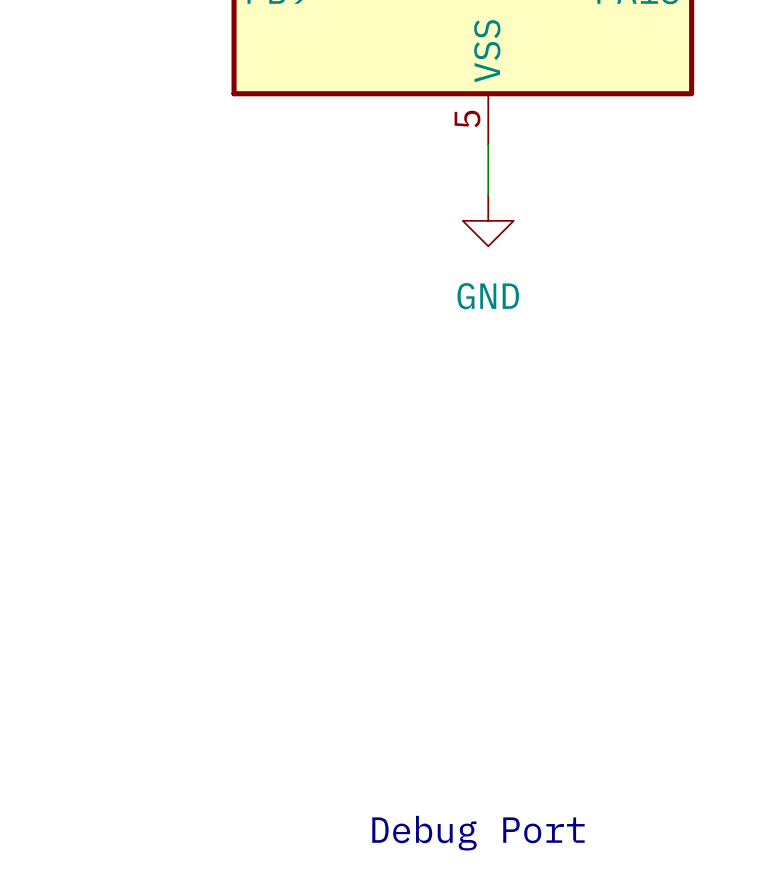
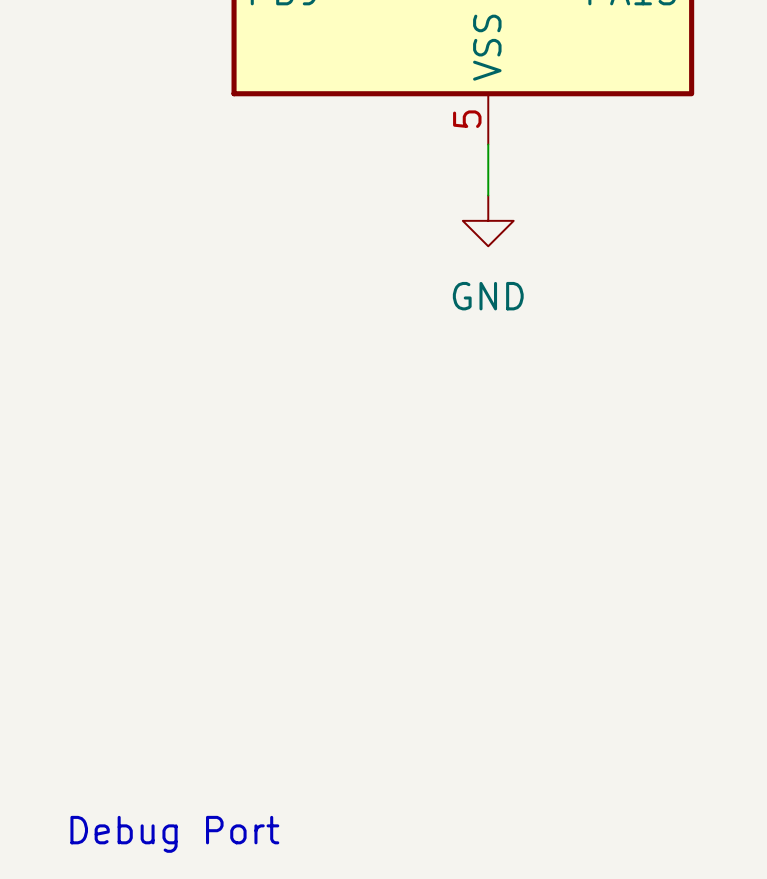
text position: Debug Port (478, 833) -> Debug Port (174, 834)

